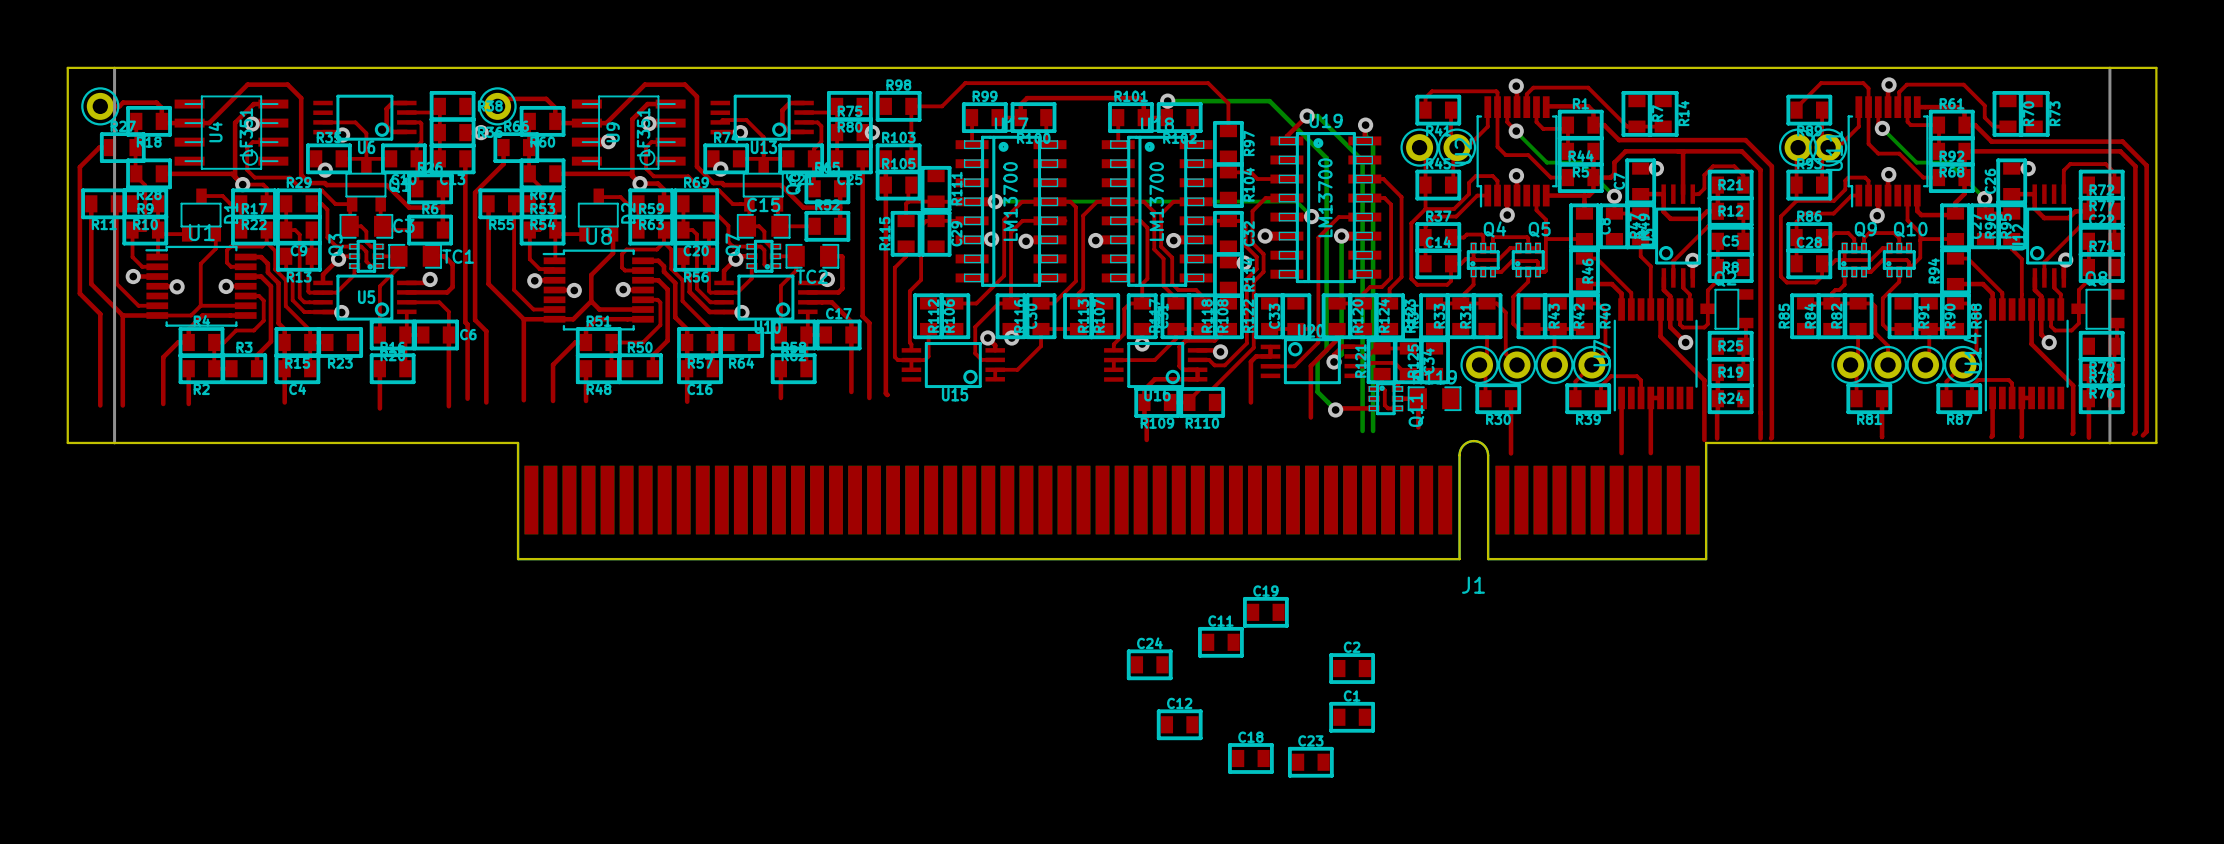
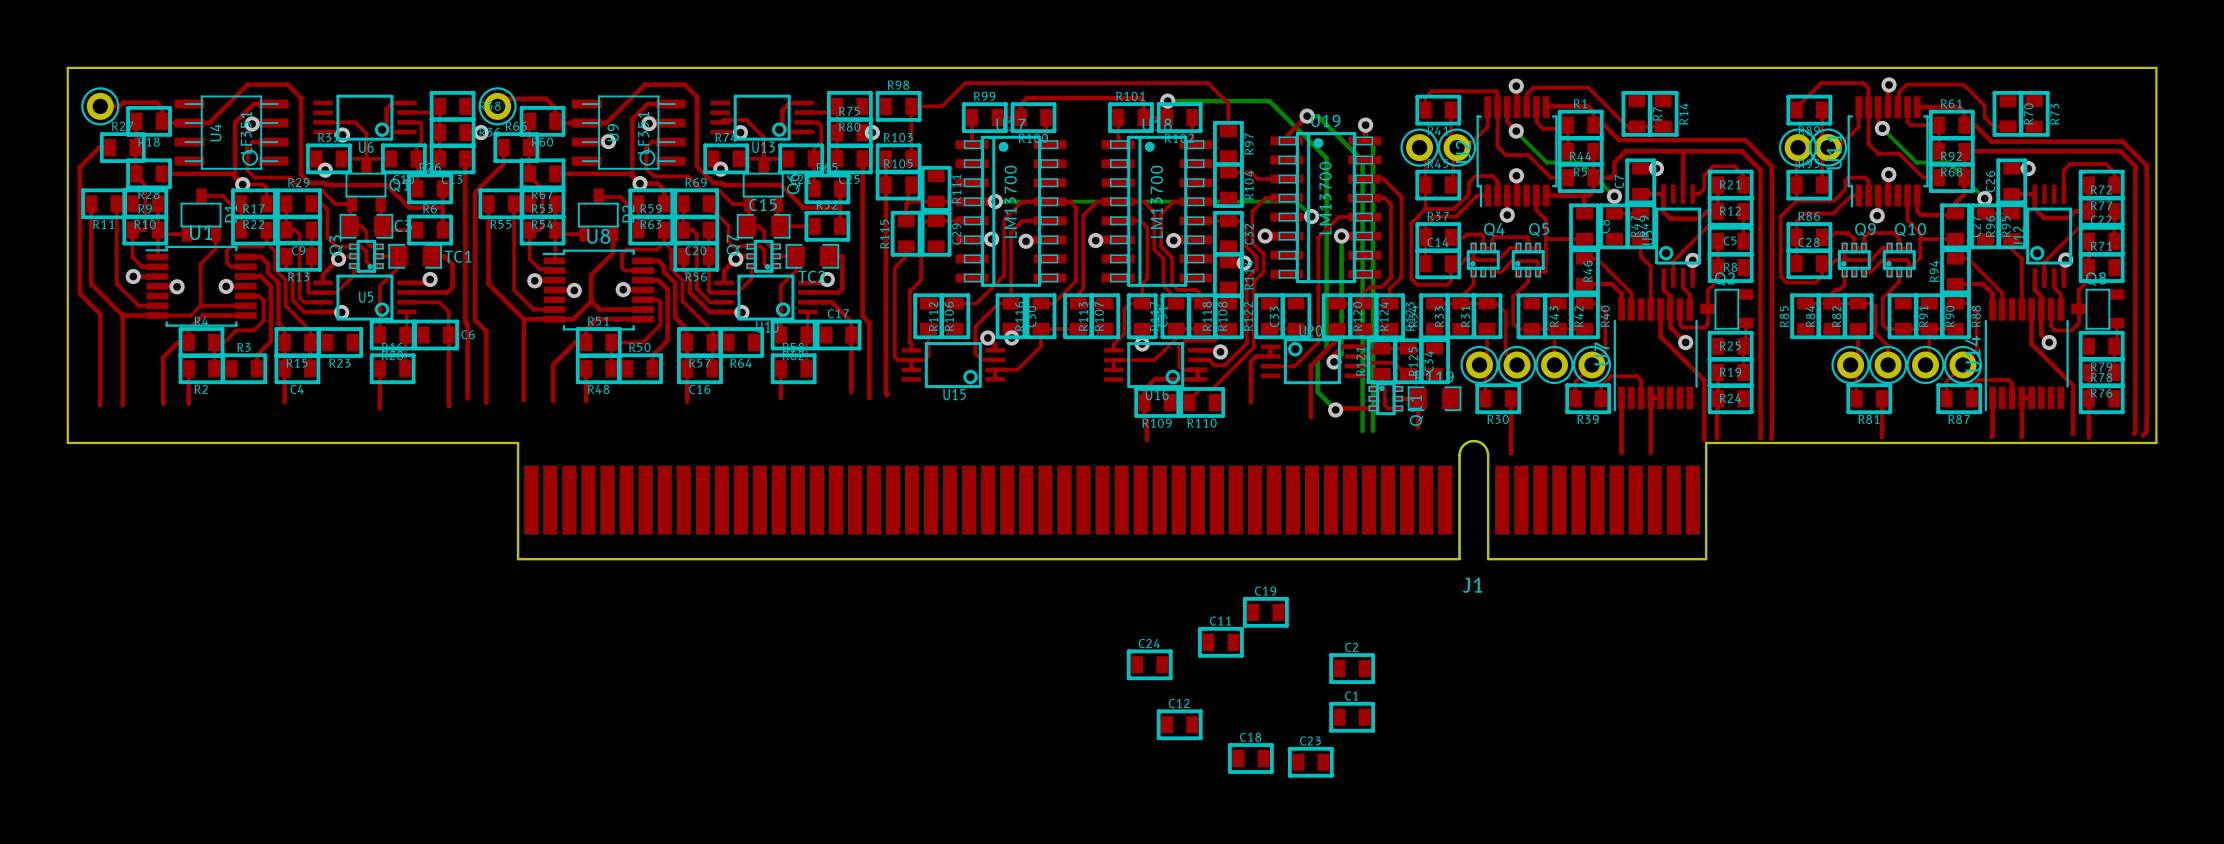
line: (114, 68) (114, 442) -> none
line: (2109, 68) (2109, 442) -> none

